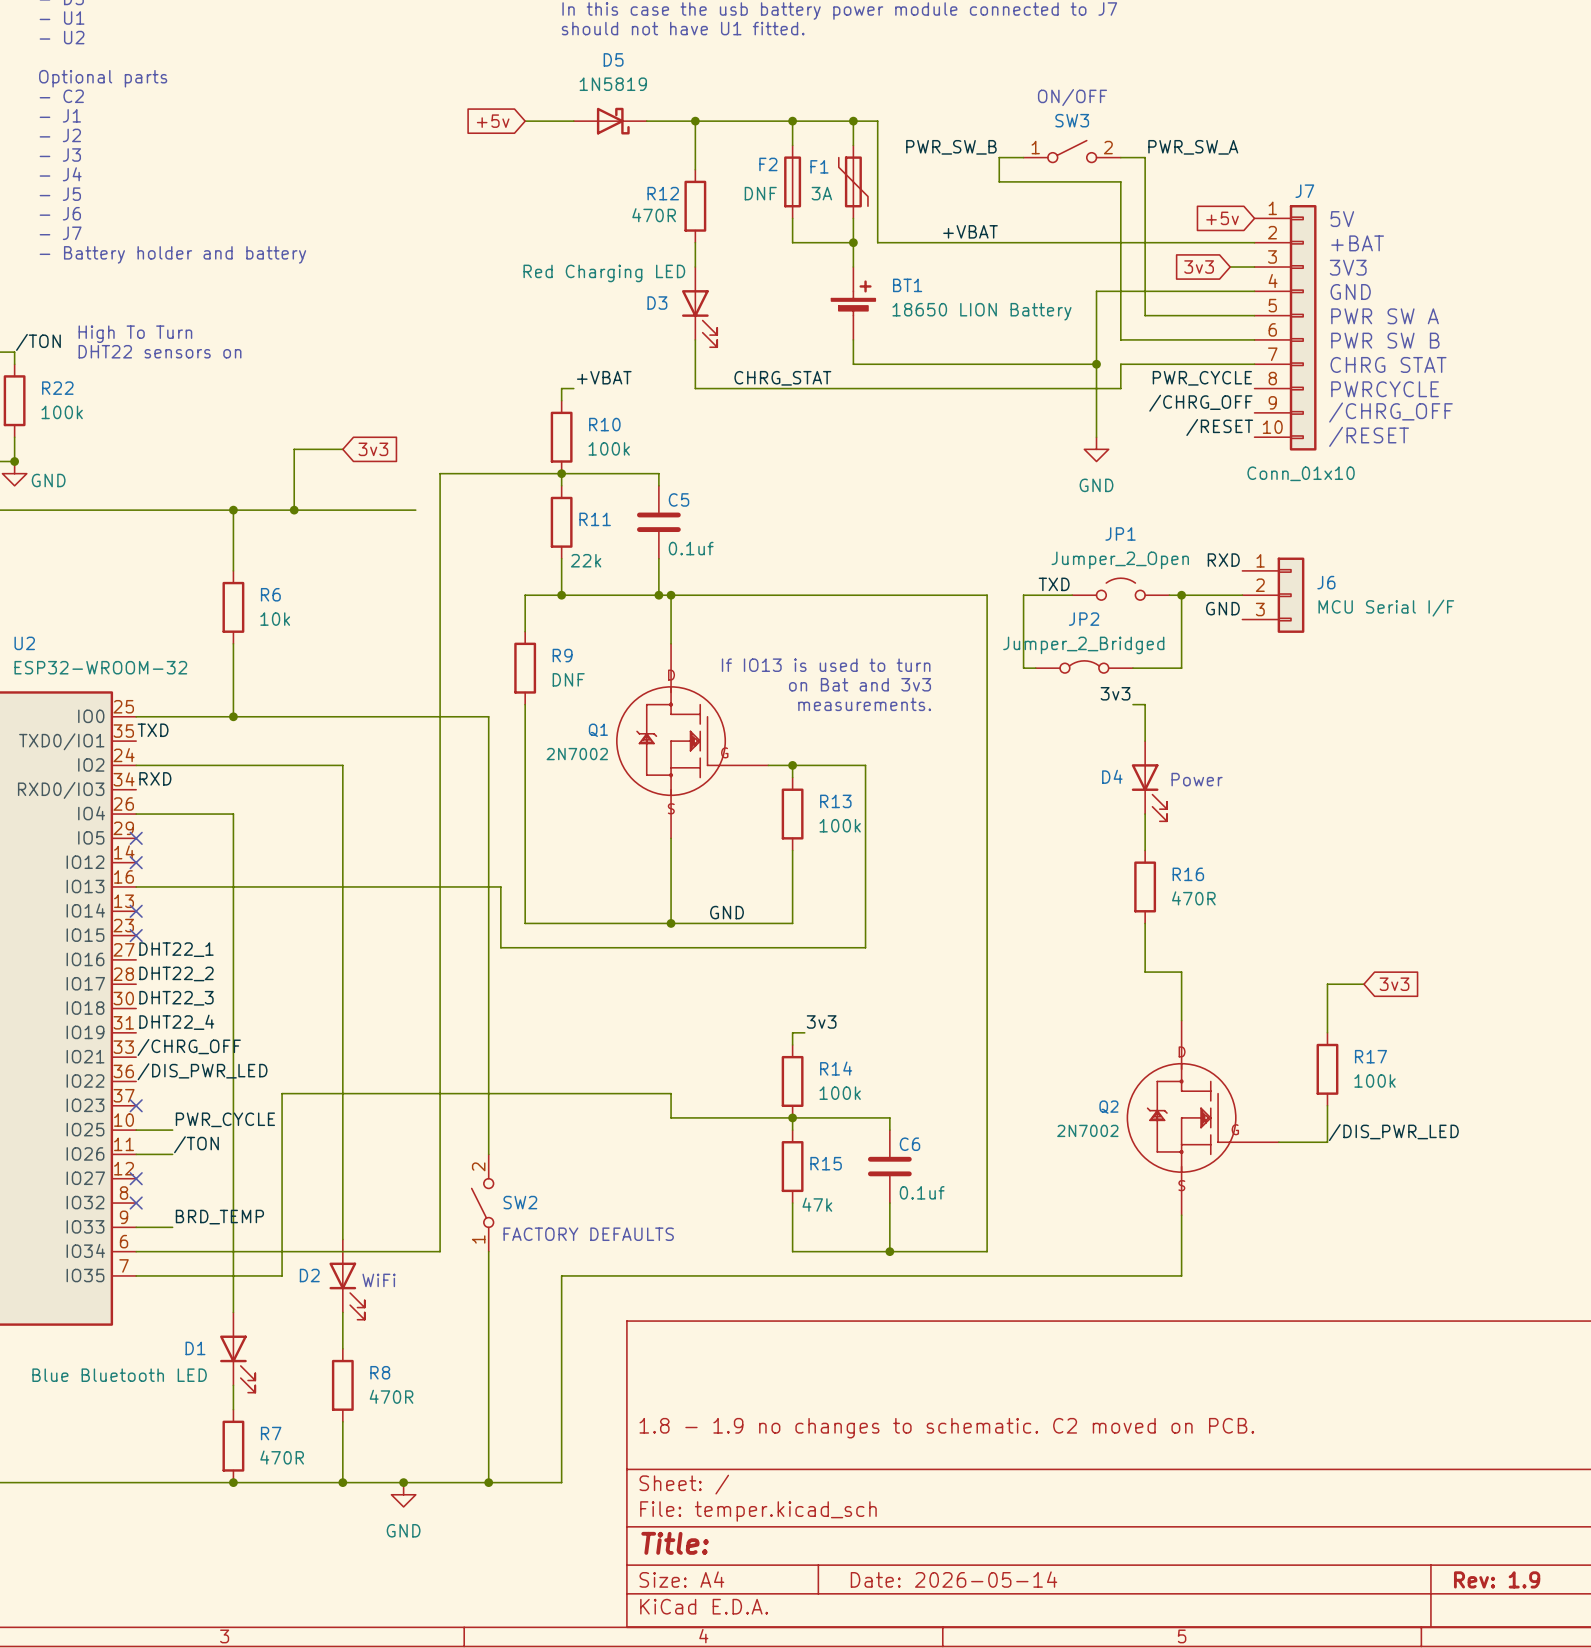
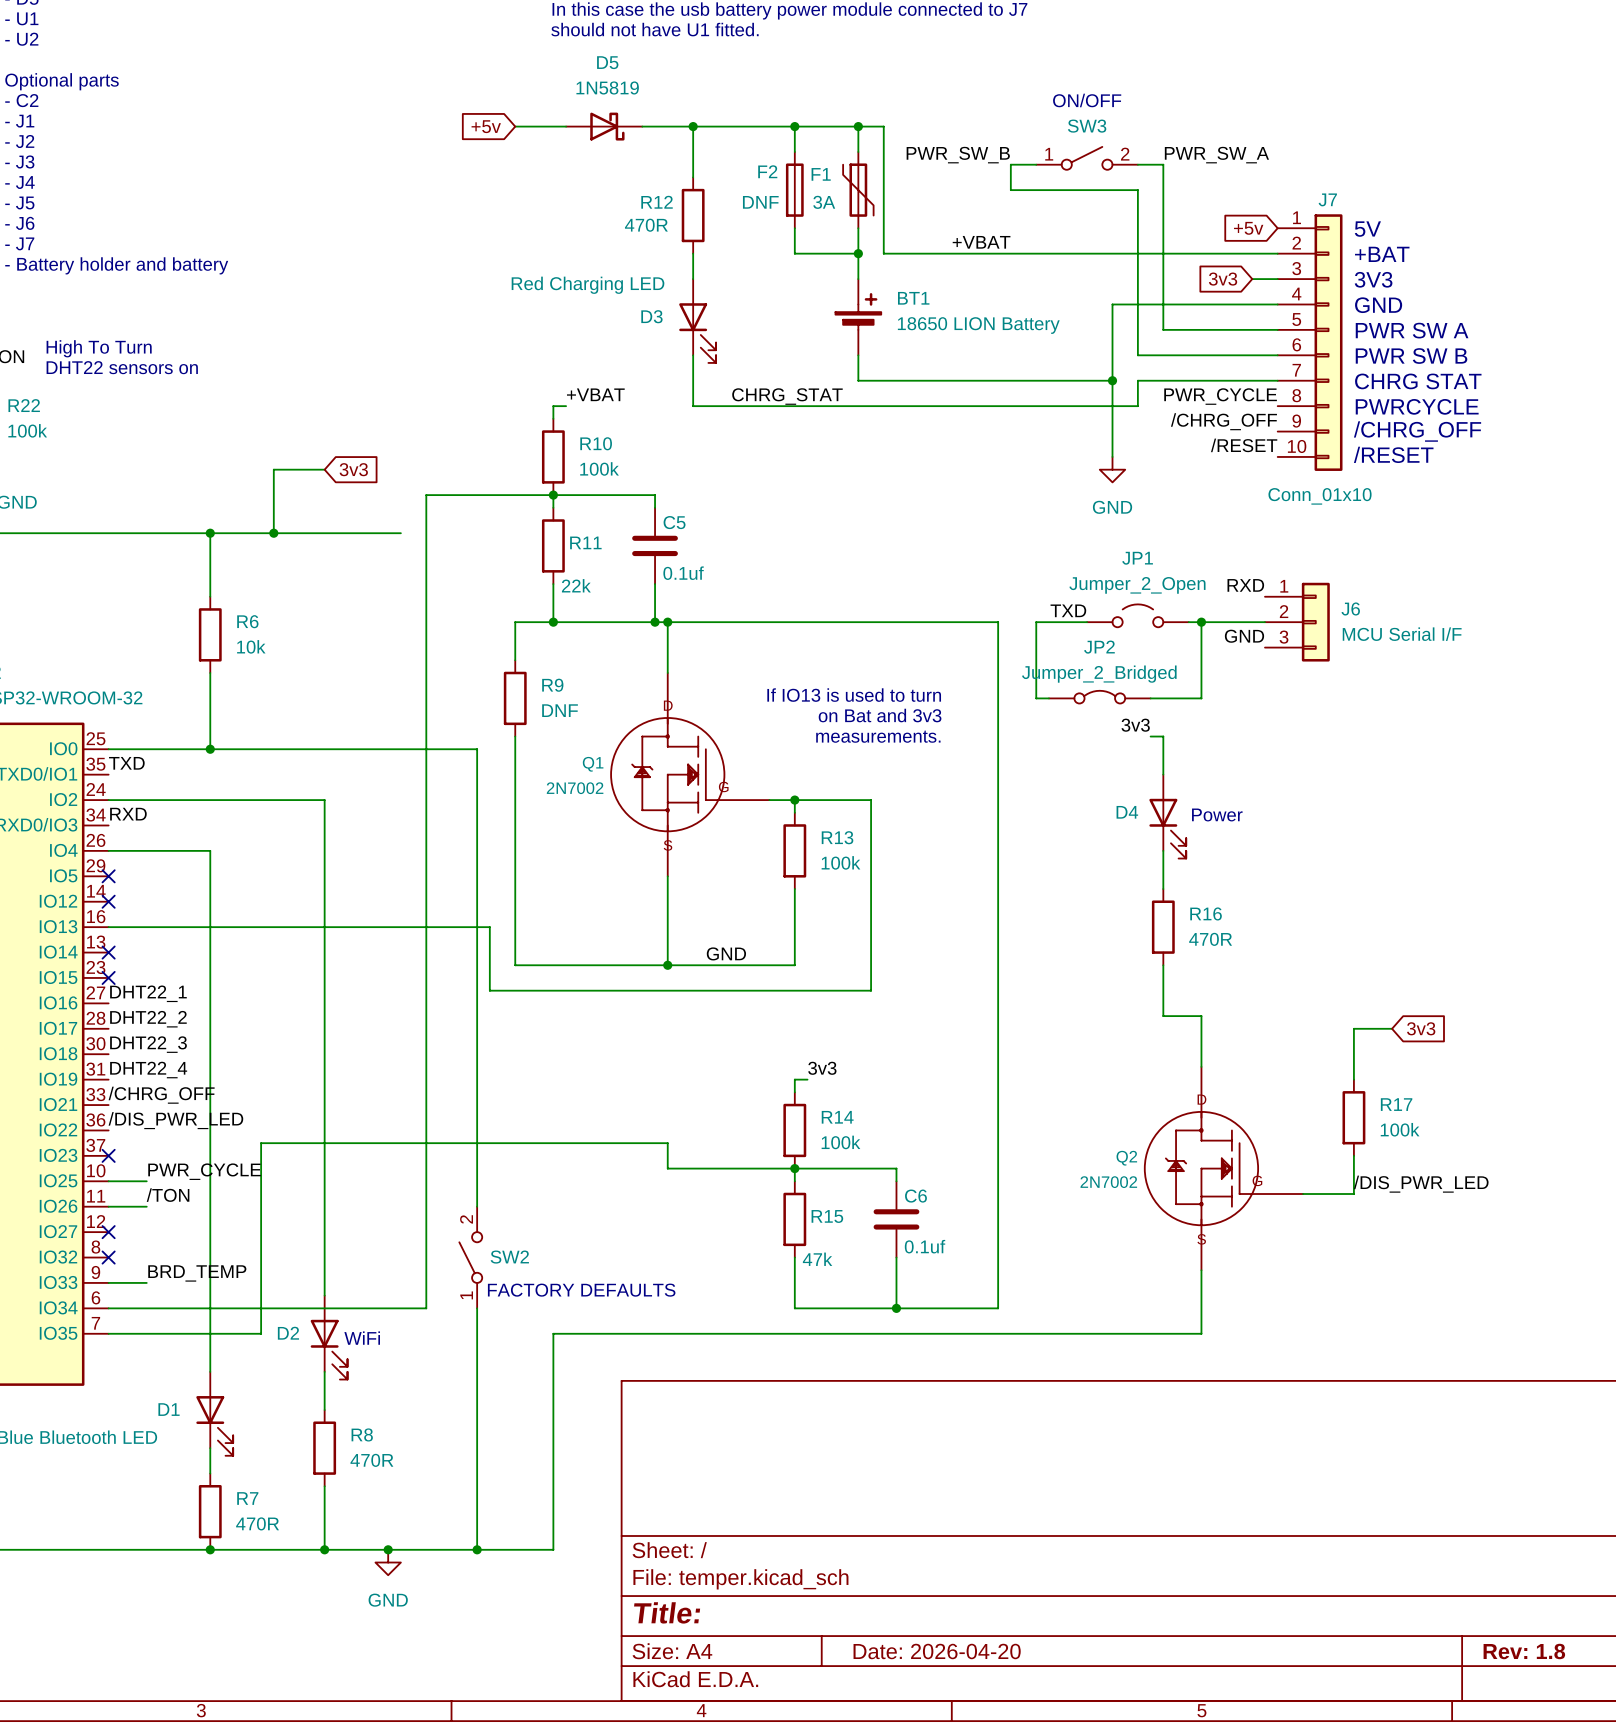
title block: 1.8 - 1.9 no changes to schematic. C2 moved on PCB. (946, 1428) -> none
title block: Date: 2026-05-14 (954, 1579) -> Date: 2026-04-20 (937, 1651)
title block: Rev: 1.9 (1497, 1579) -> Rev: 1.8 (1524, 1651)

